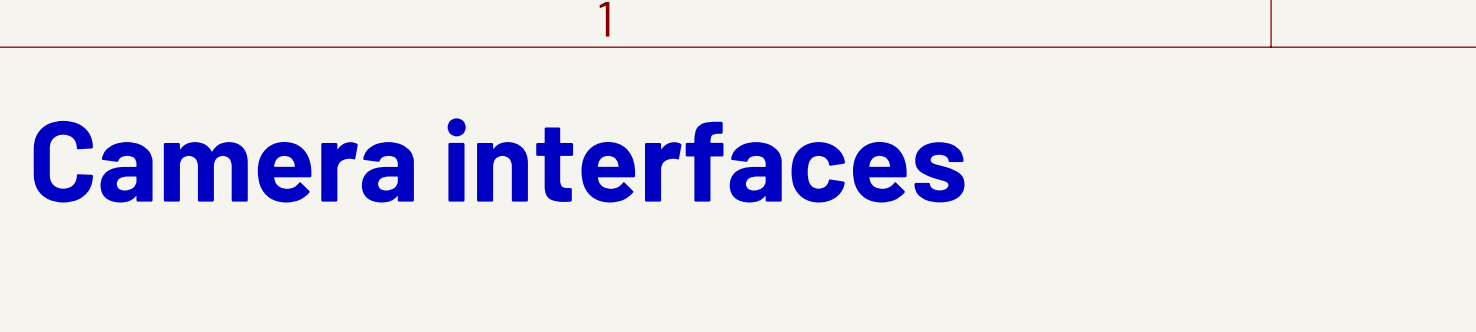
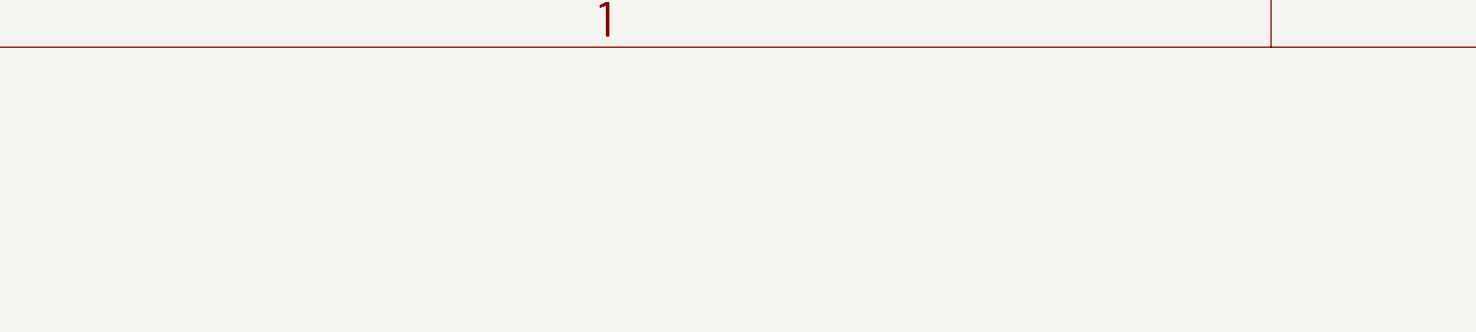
text: Camera interfaces (499, 160) -> none

